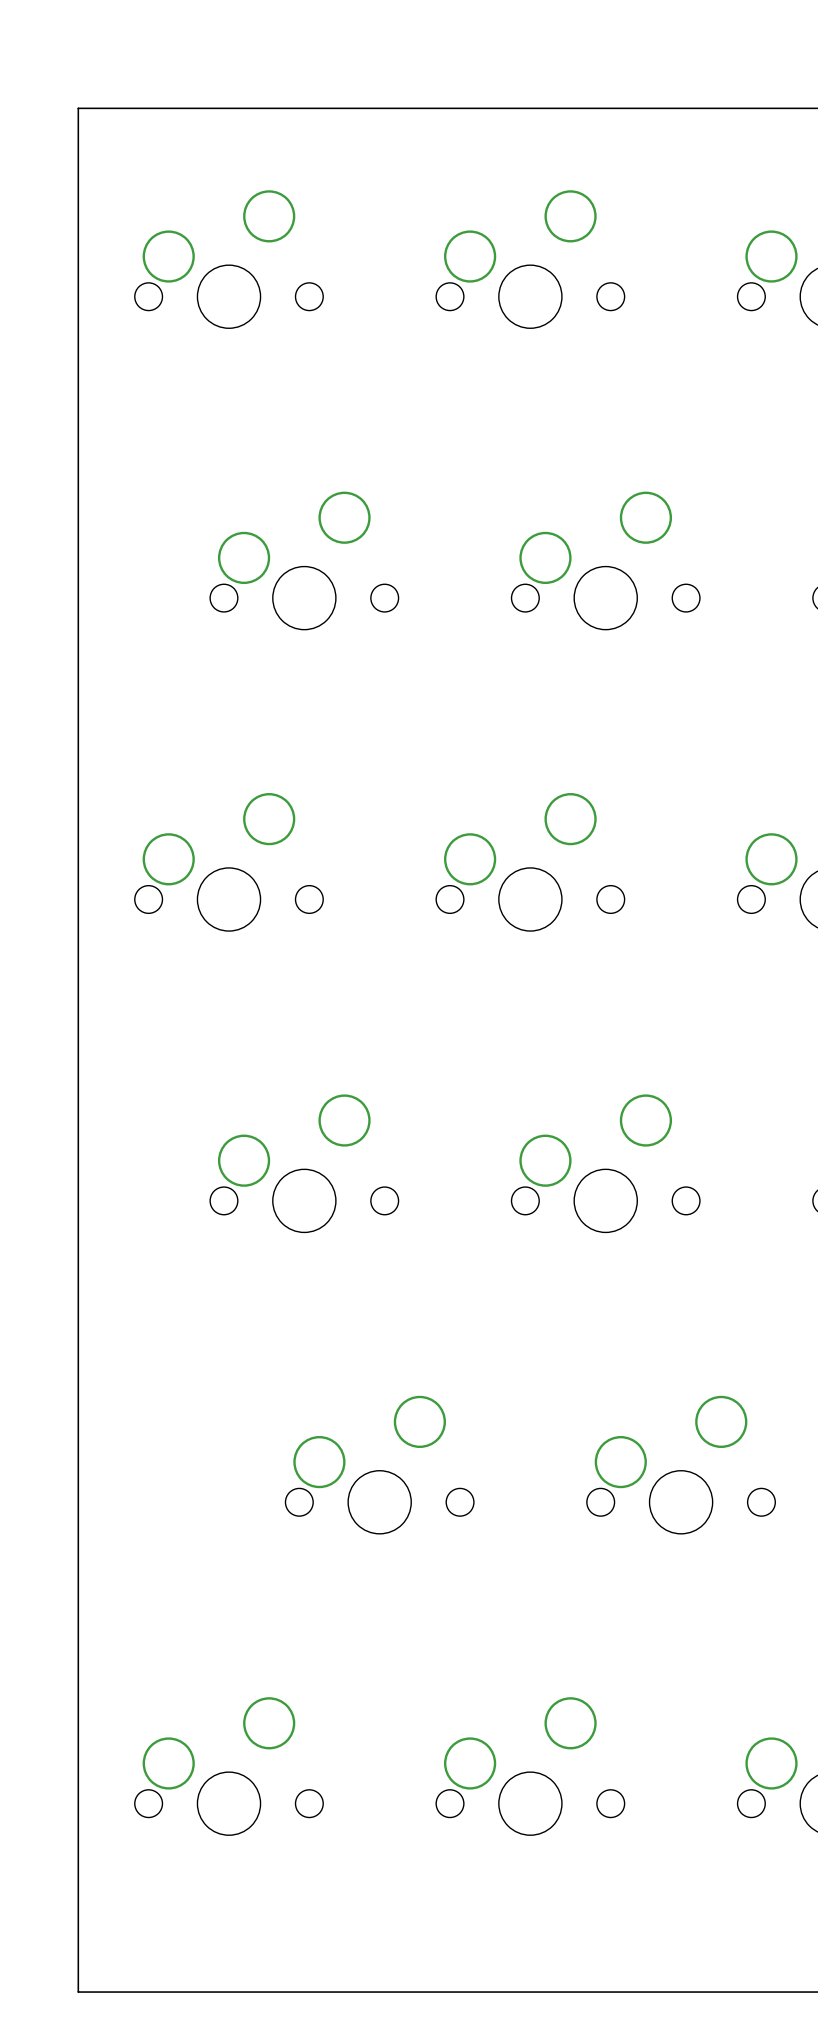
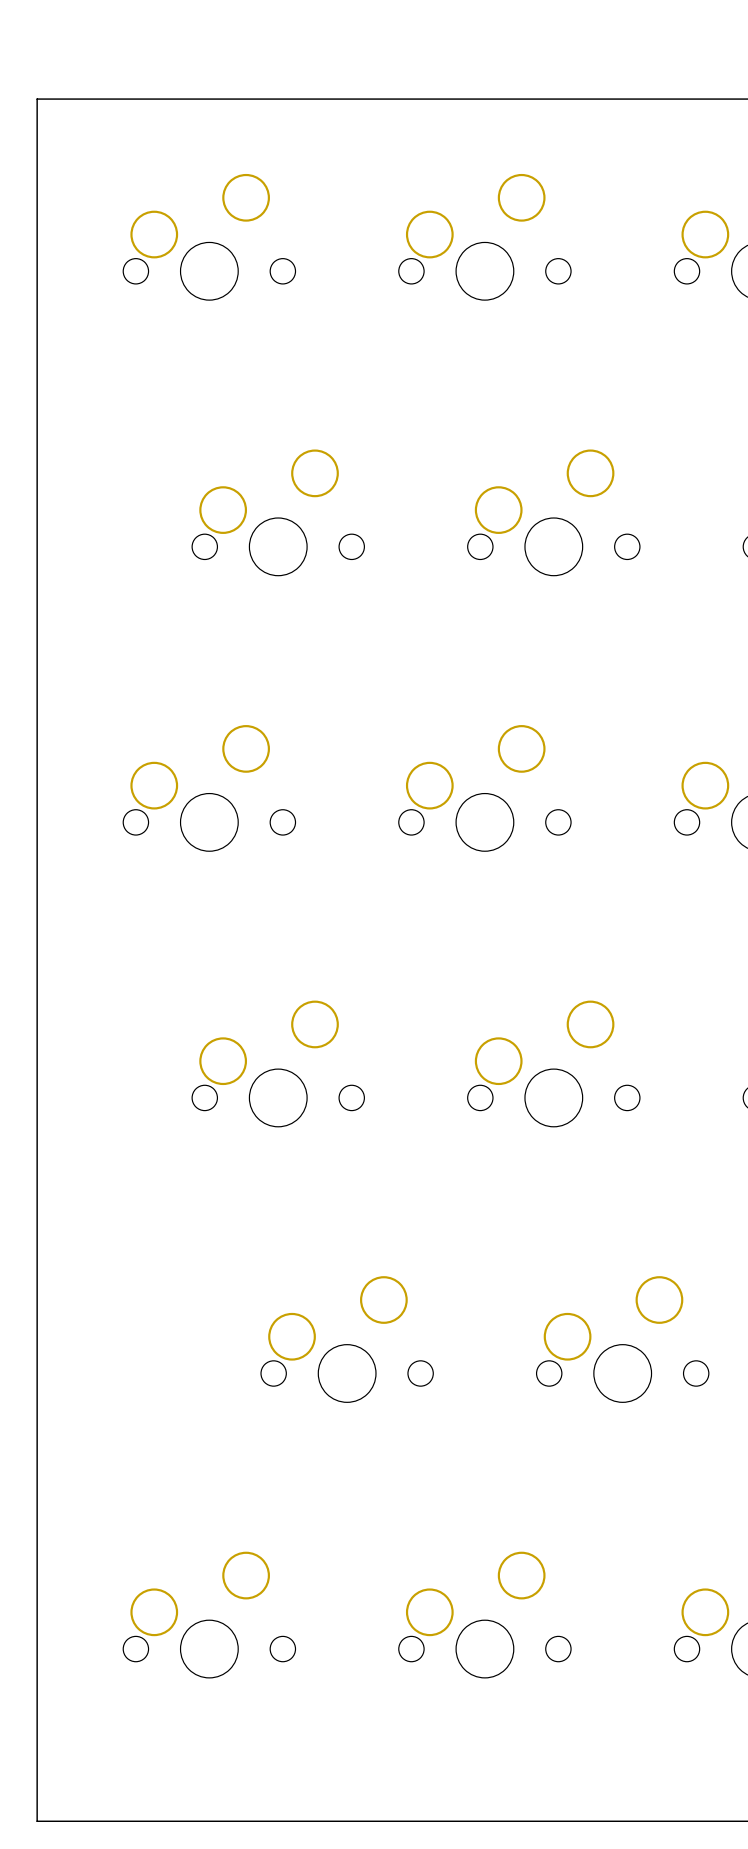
board edge: (78, 108) (78, 1992) -> (71, 99) (37, 99) (37, 1821) (71, 1821)

